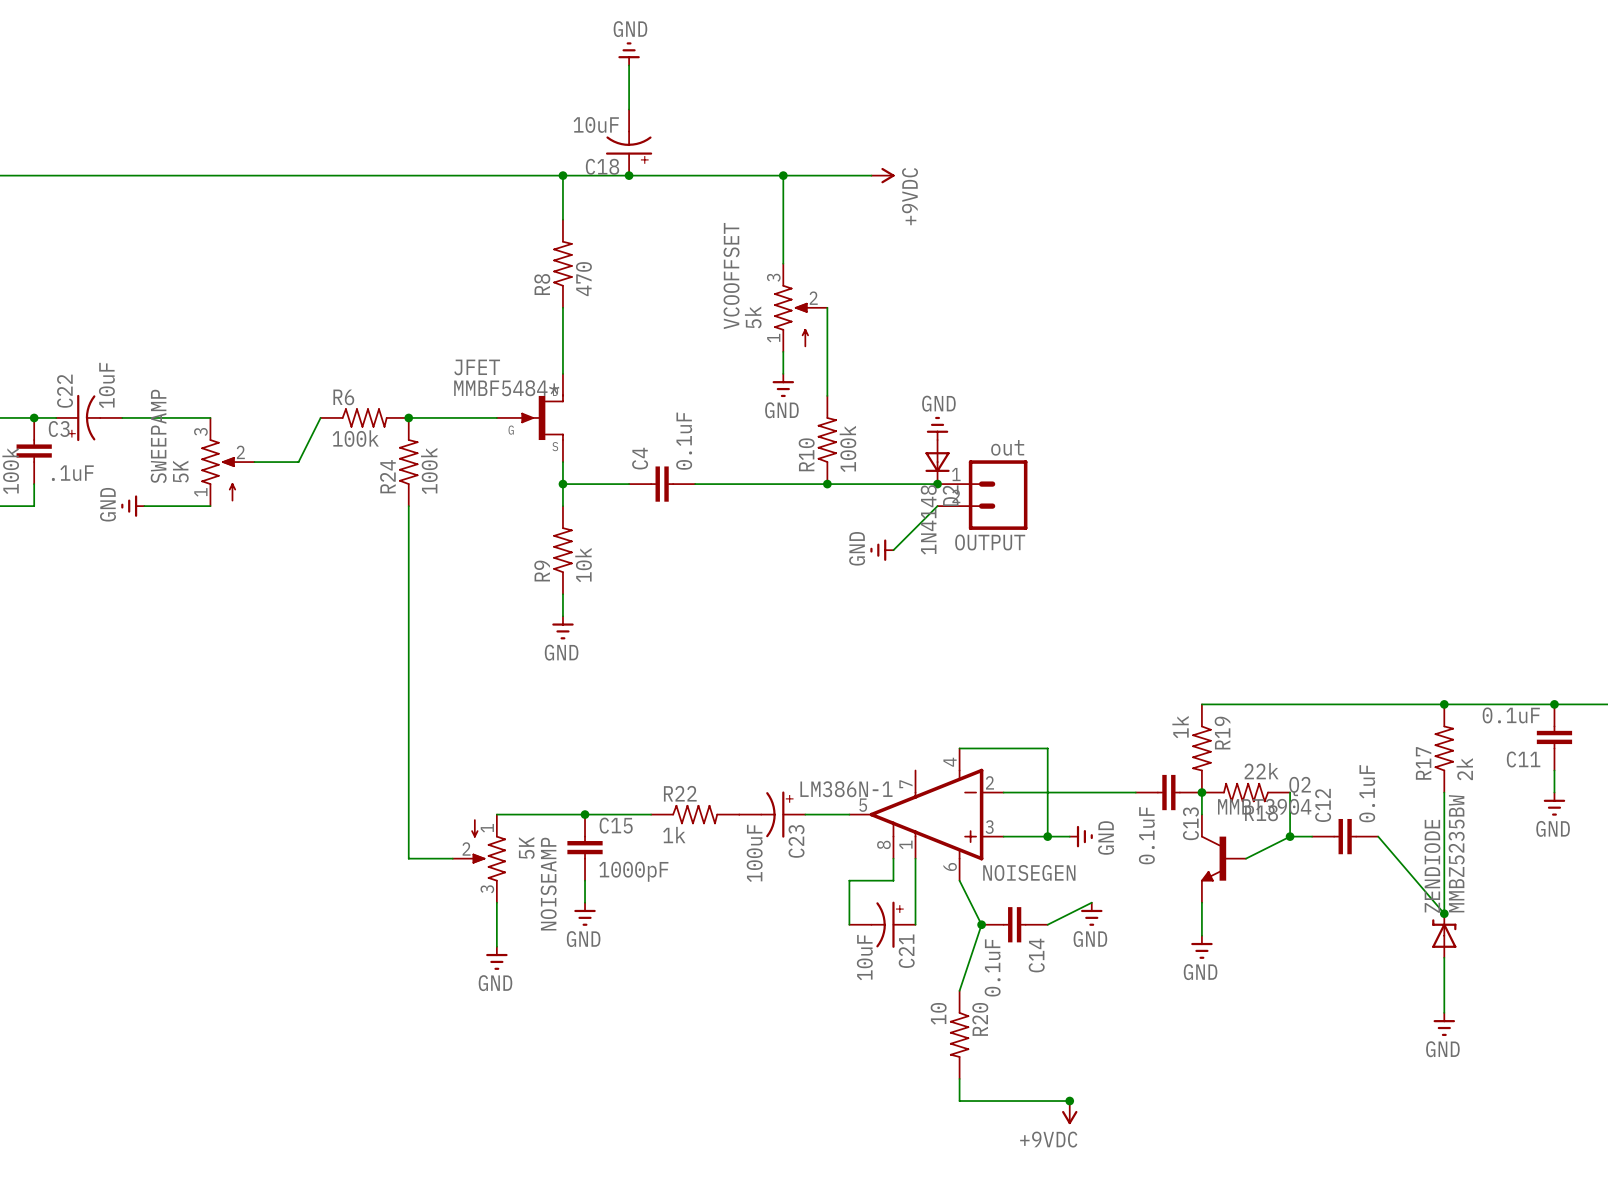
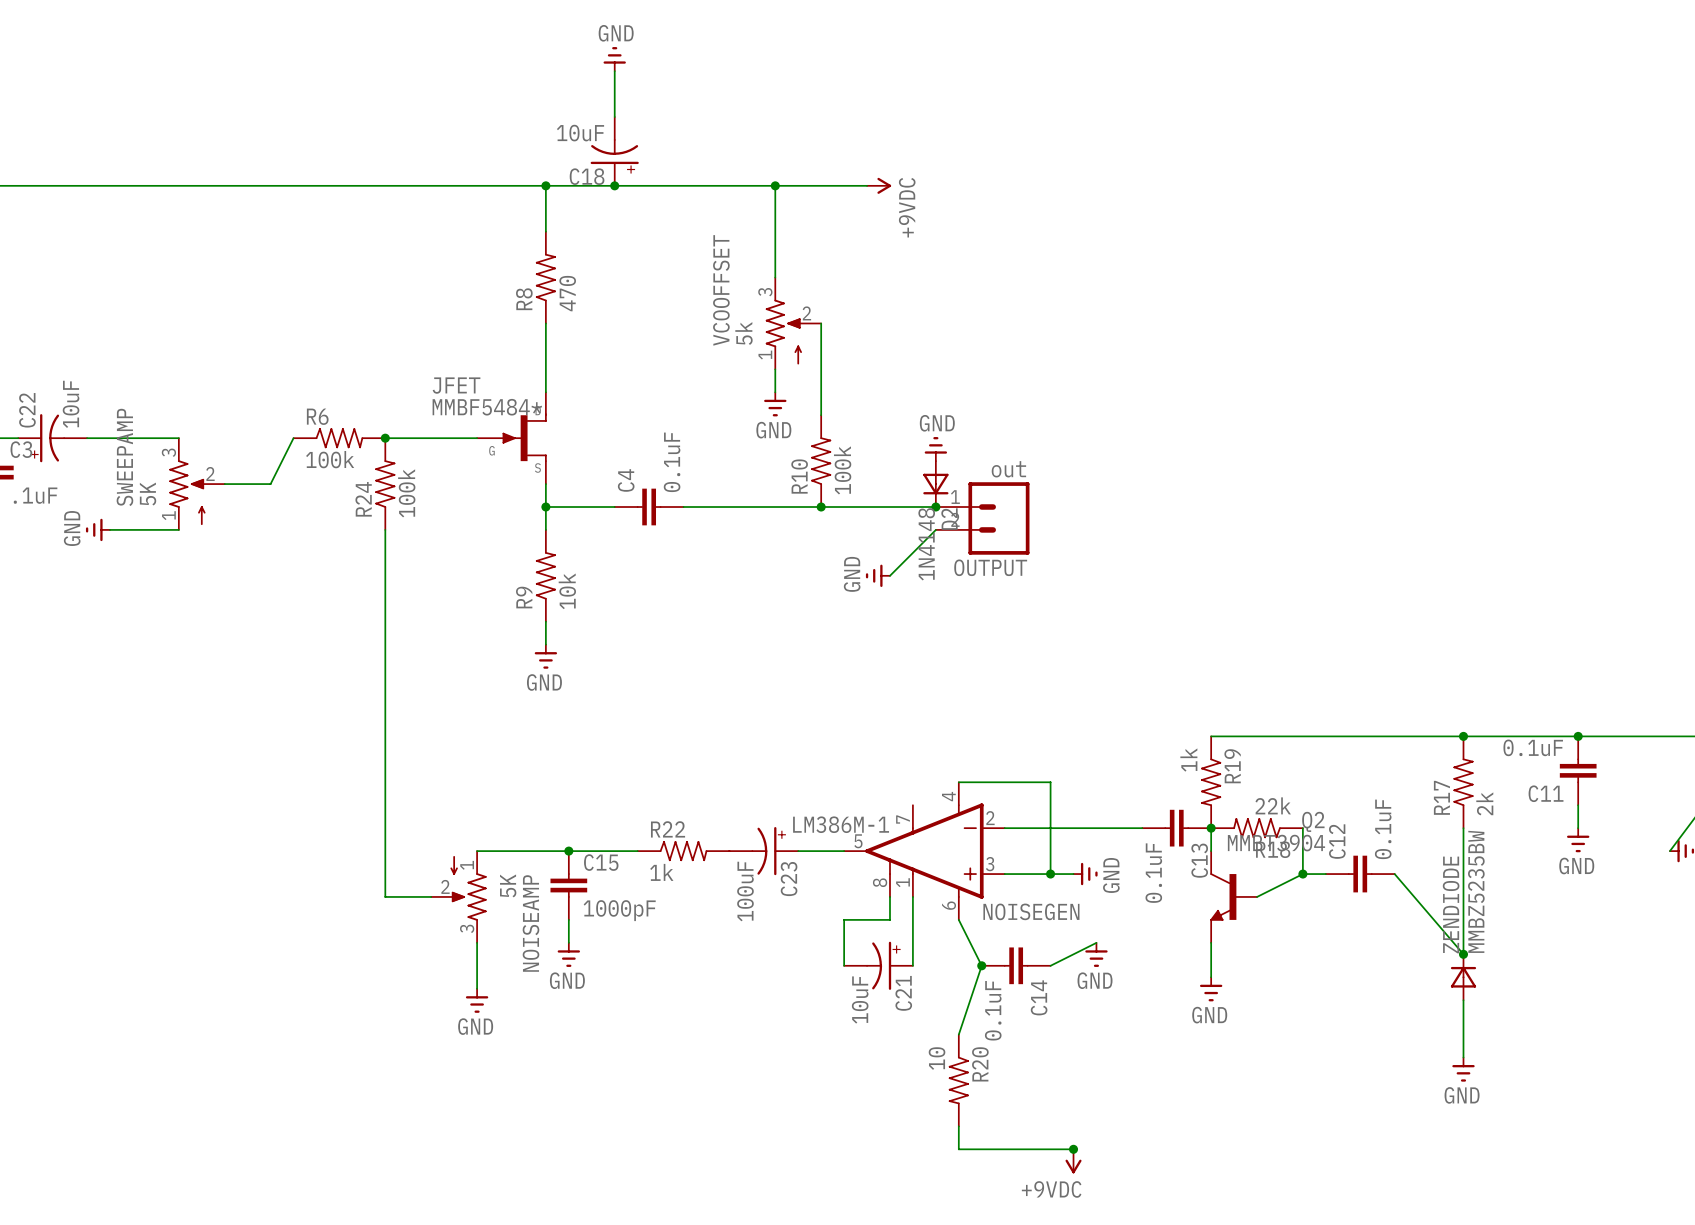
NOISEGEN value: LM386N-1 (846, 789) -> LM386M-1 (841, 824)
ZENDIODE symbol: [1432, 913, 1457, 958] -> [1450, 954, 1477, 1001]

